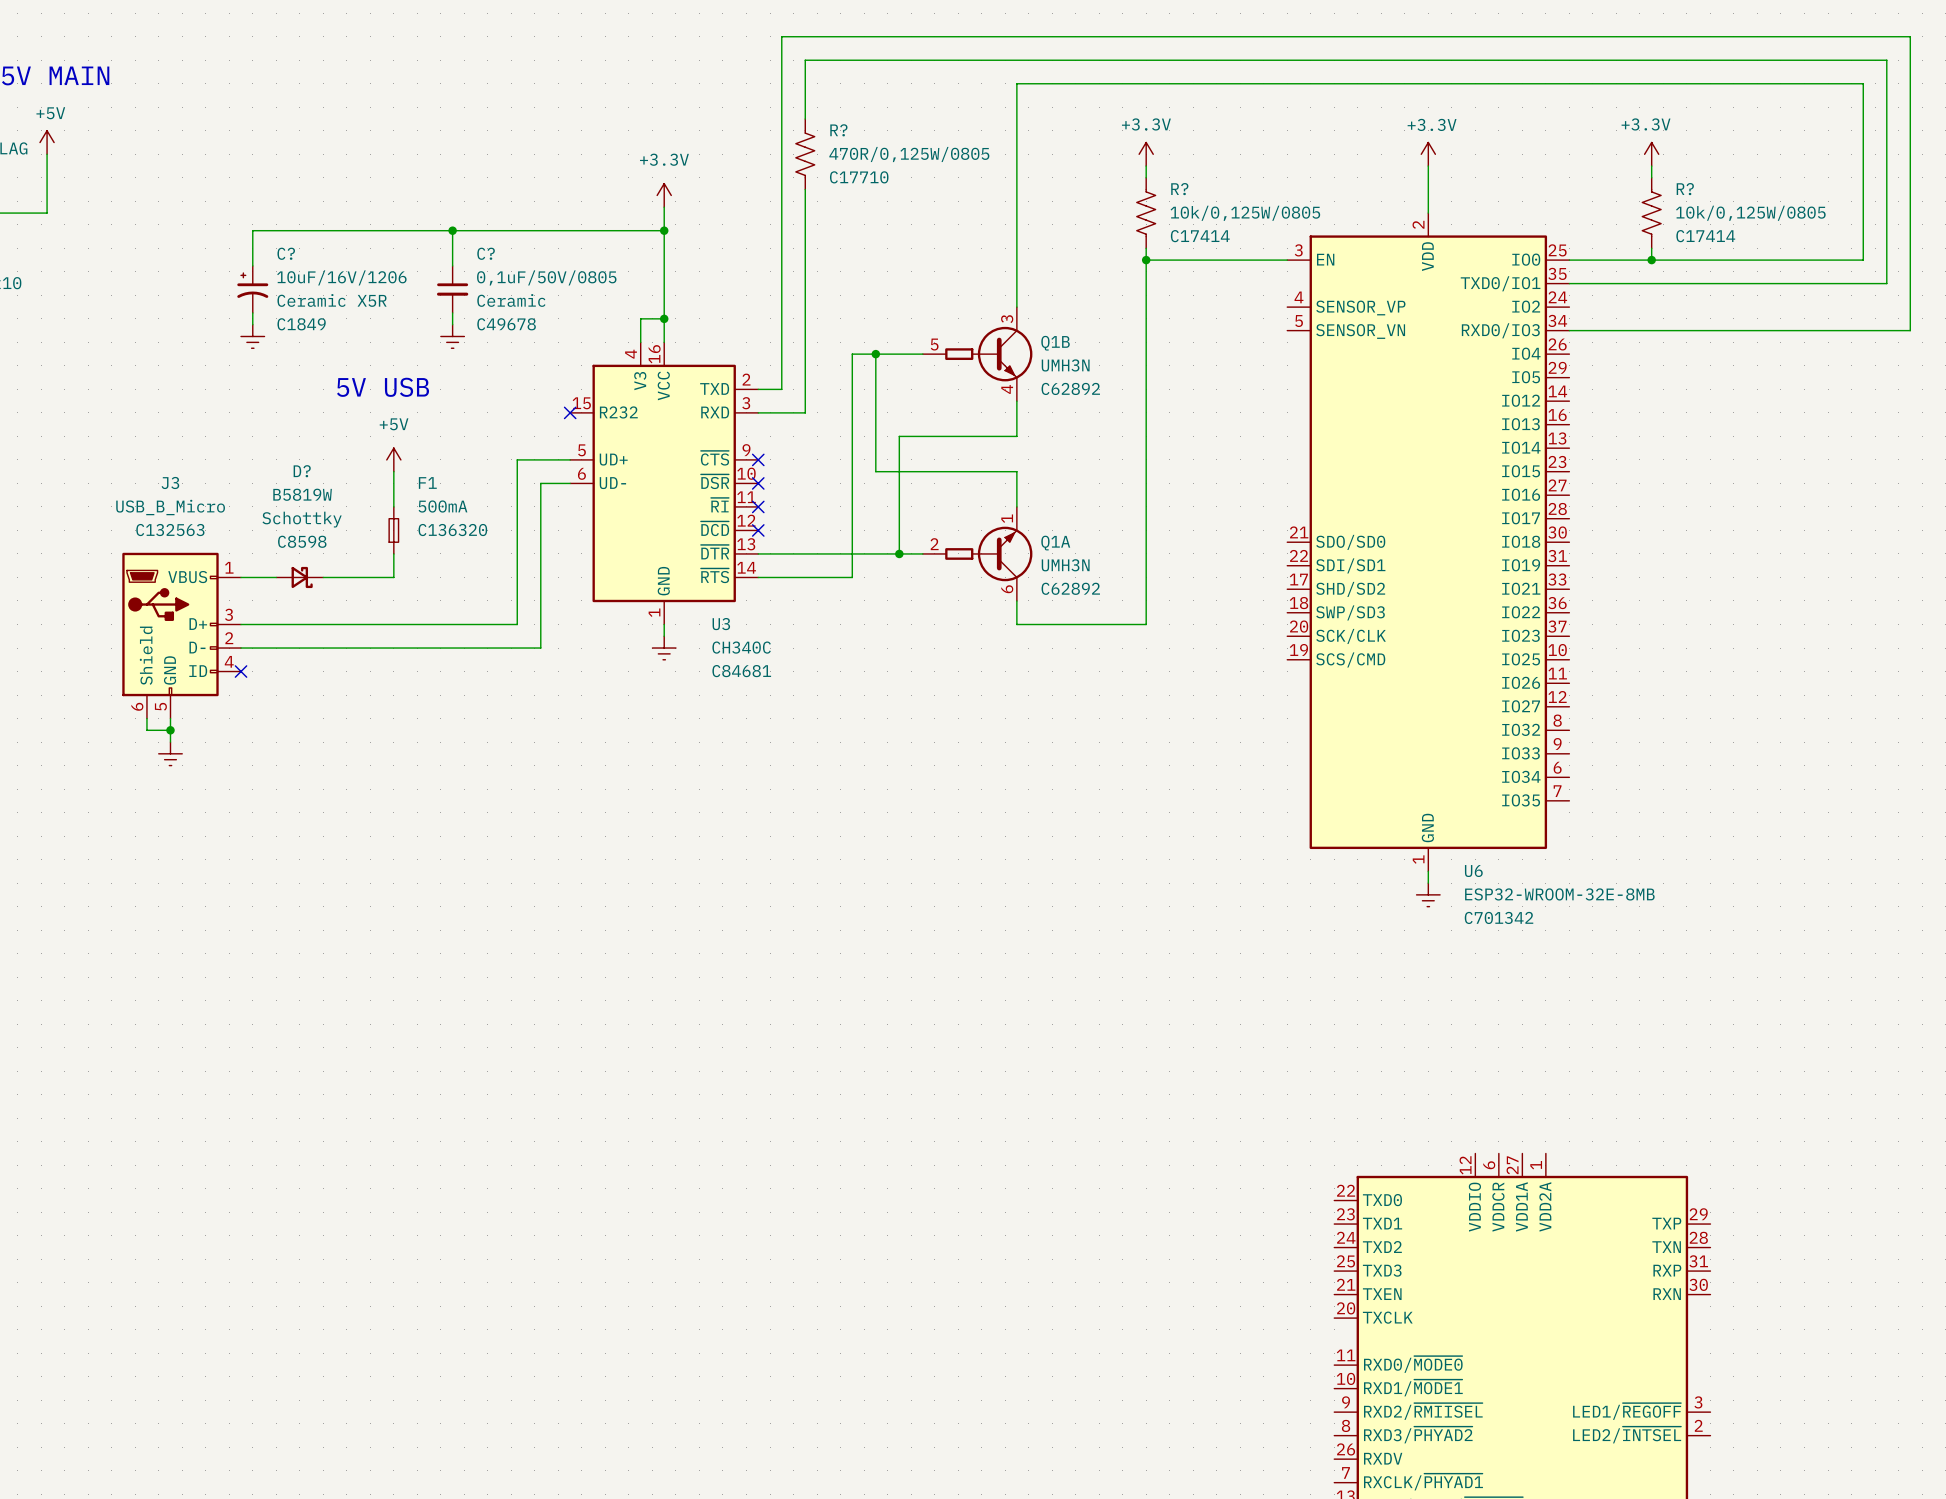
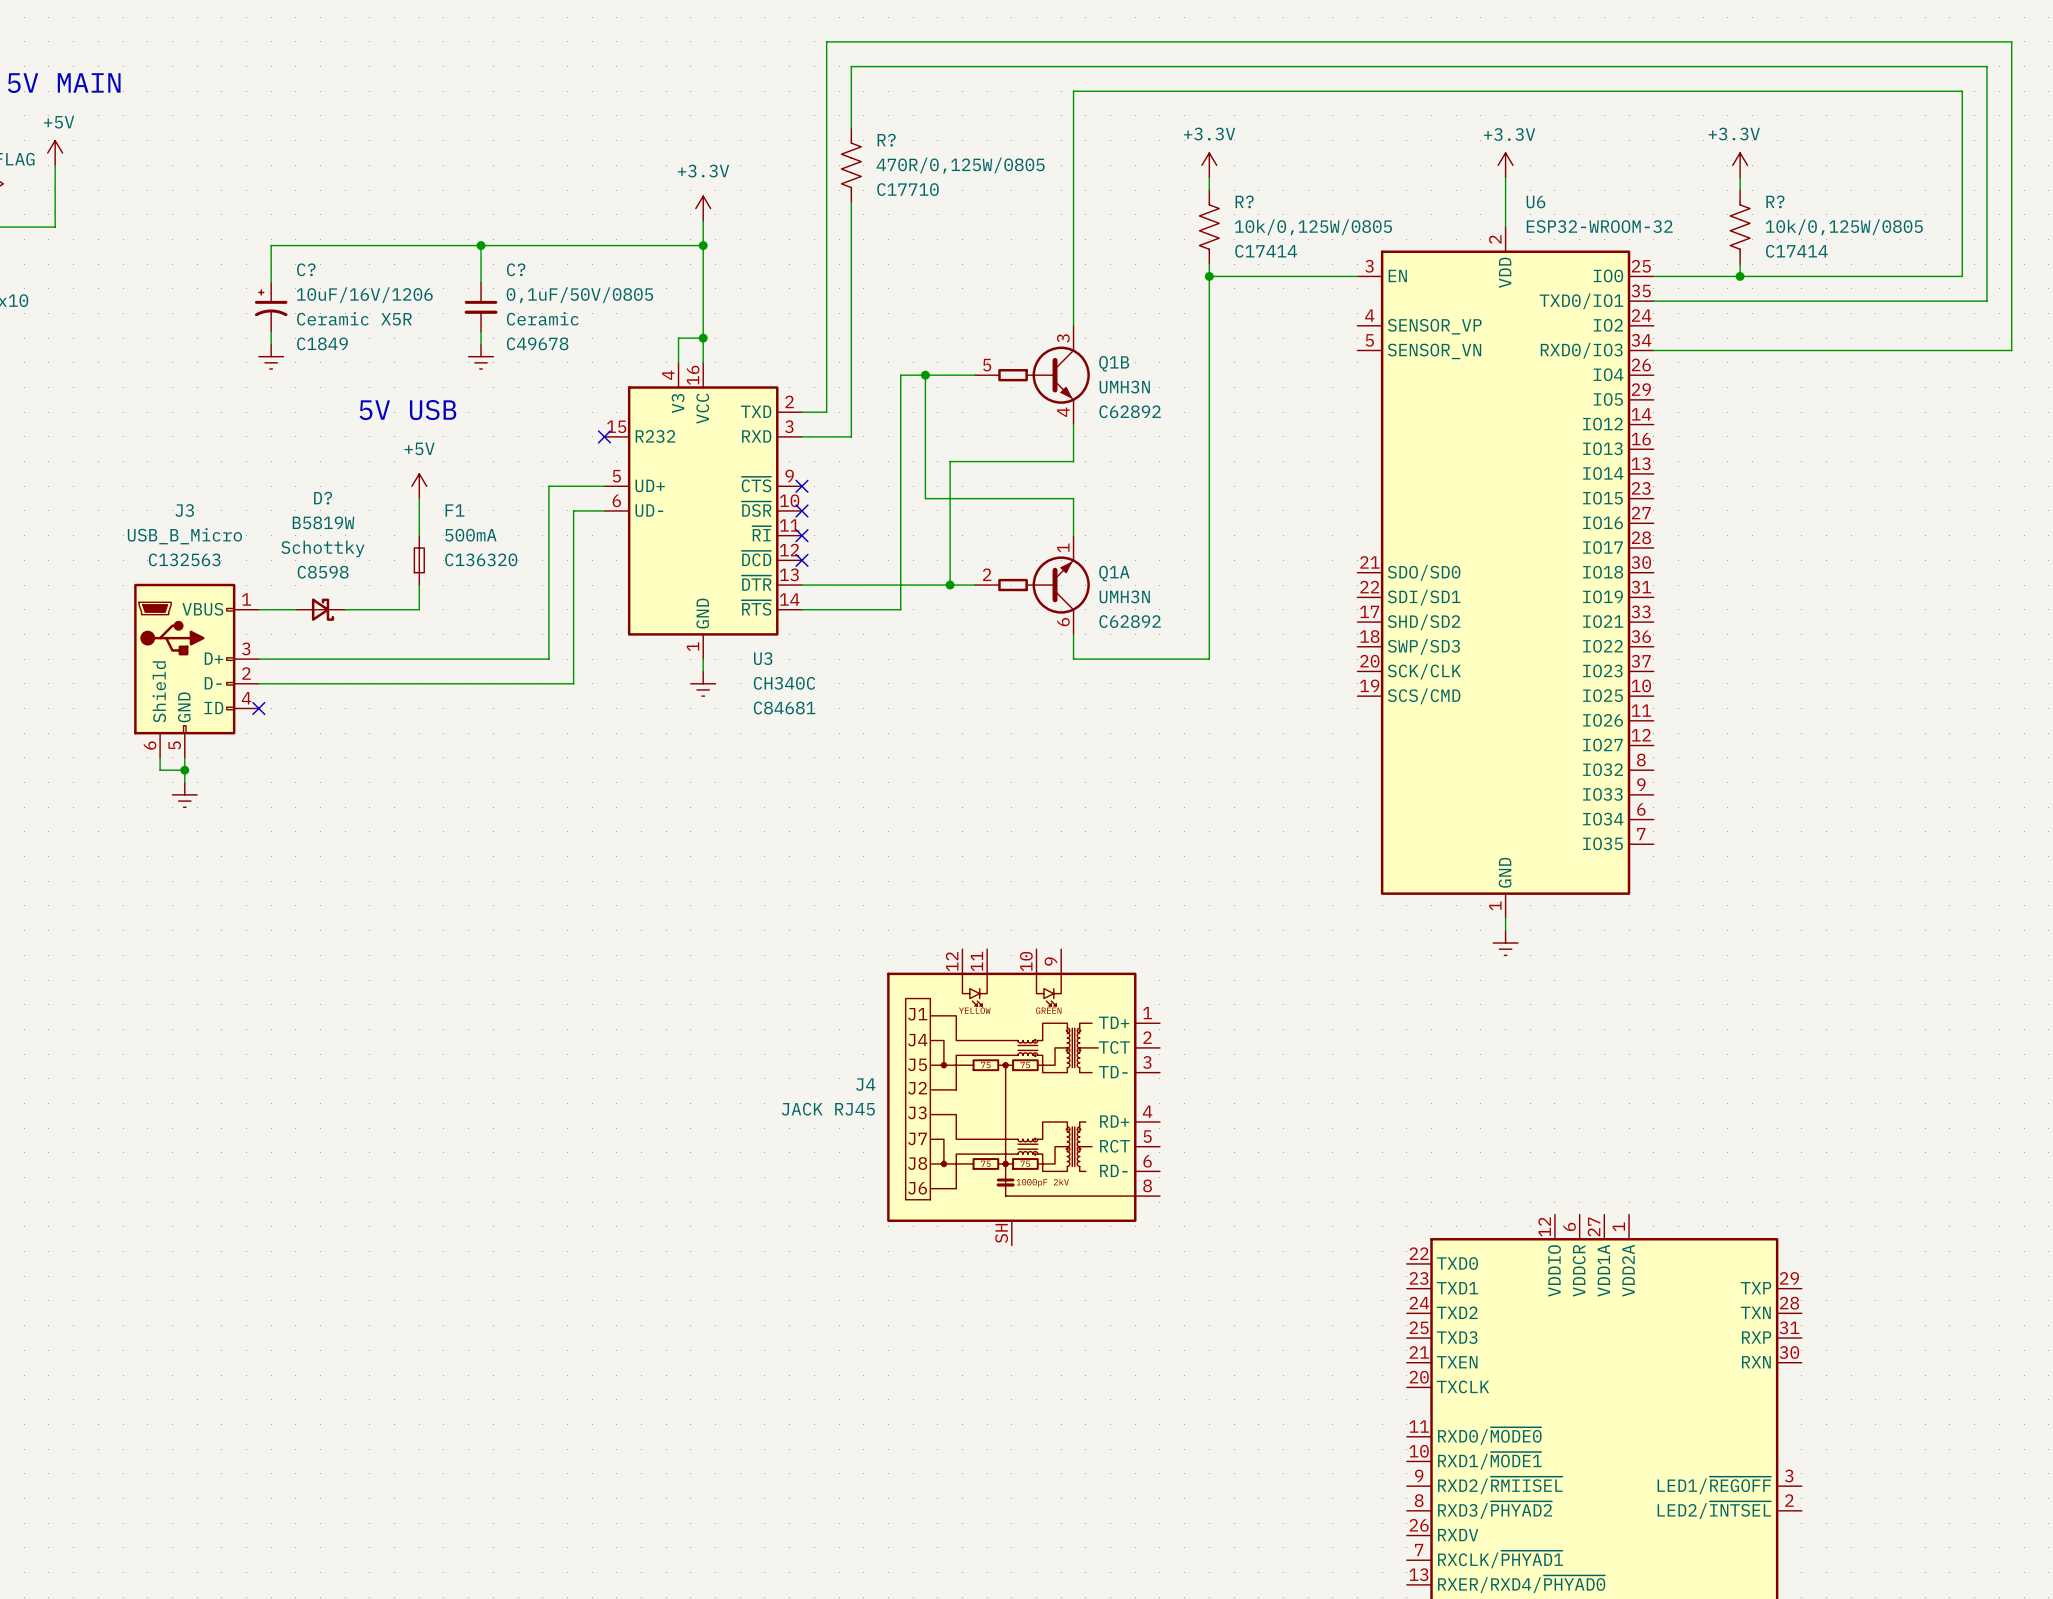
U6 name position: U6 (1473, 871) -> U6 (1535, 202)
U6 value: ESP32-WROOM-32E-8MB (1559, 894) -> ESP32-WROOM-32 (1599, 226)
U6 text: C701342 (1499, 917) -> none
J4: none -> JACK RJ45 (1023, 1097)

